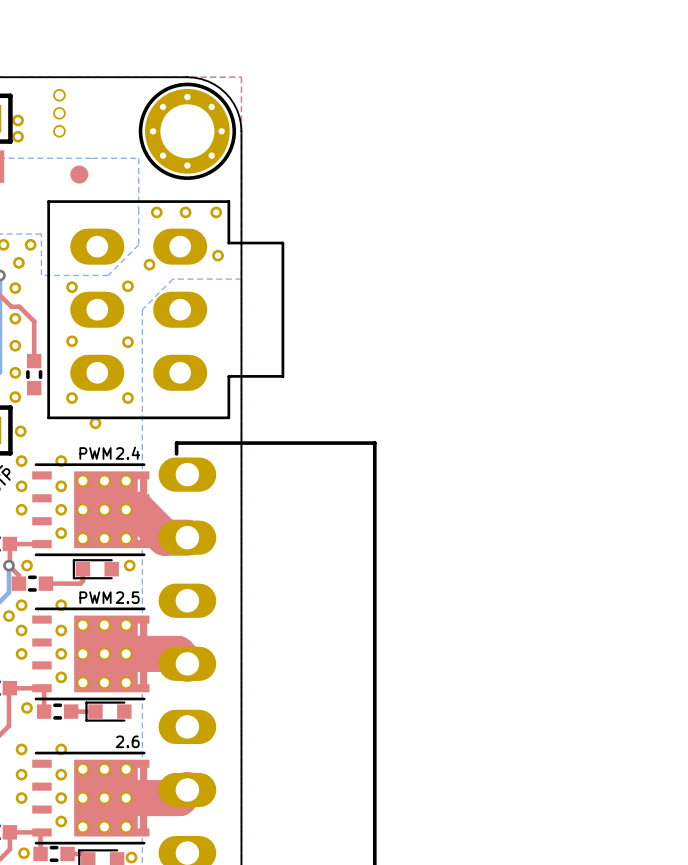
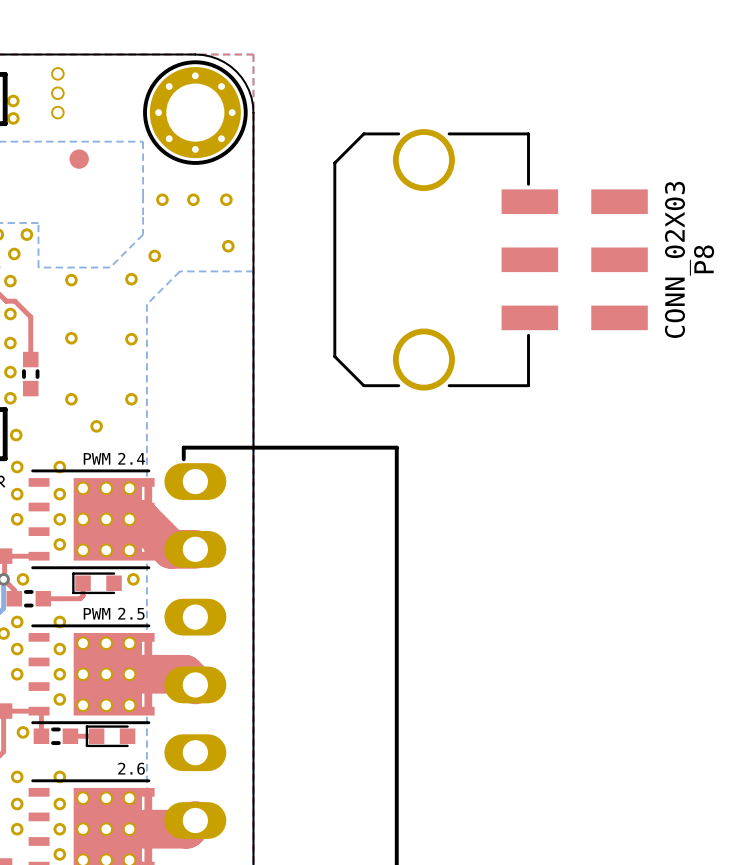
P8: none -> CONN_02X03 (490, 259)
part: (165, 309) -> none

